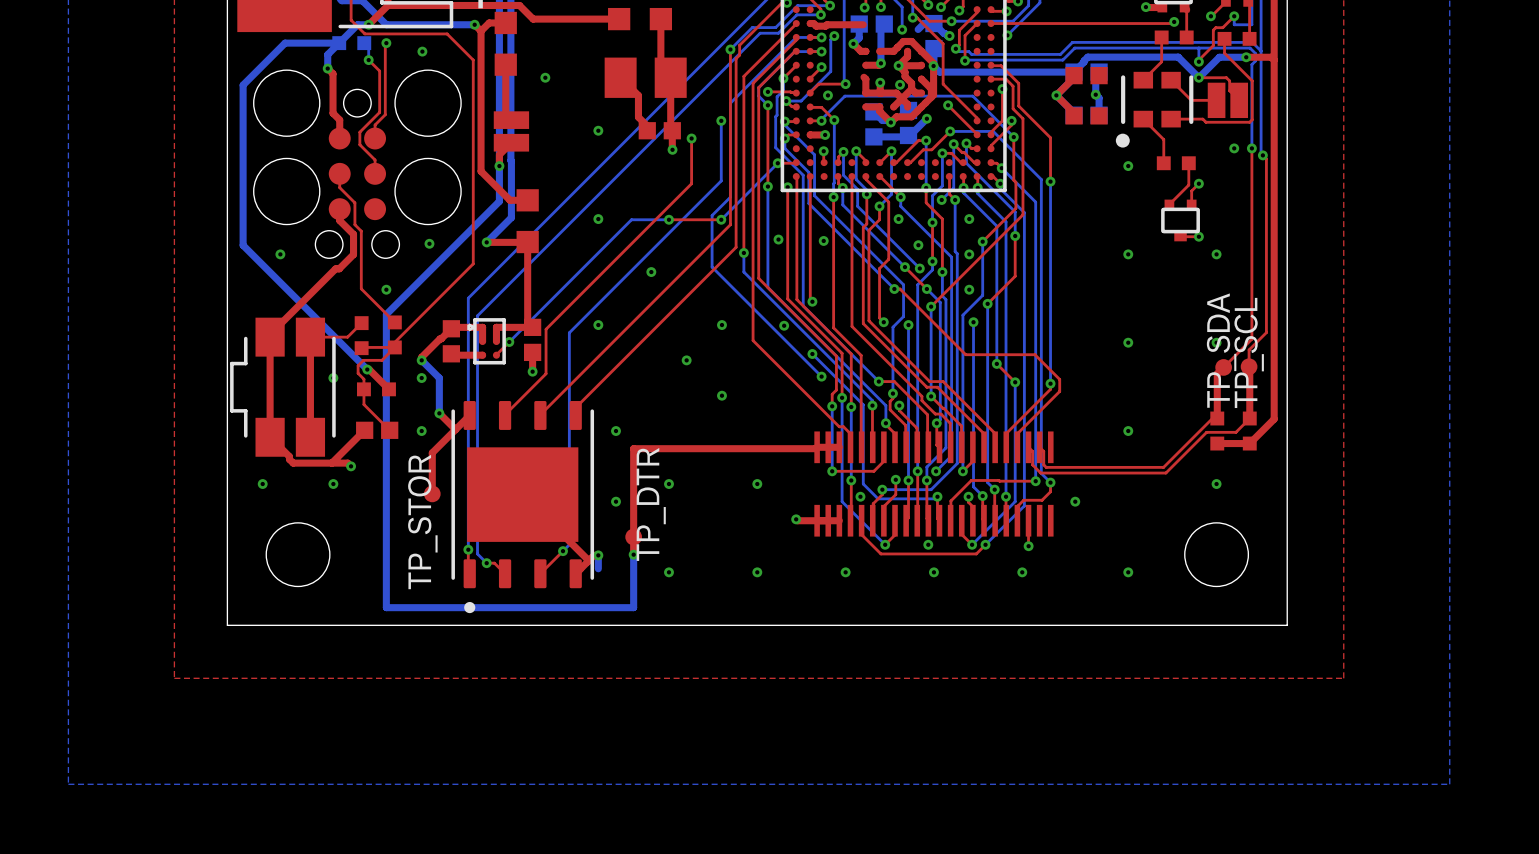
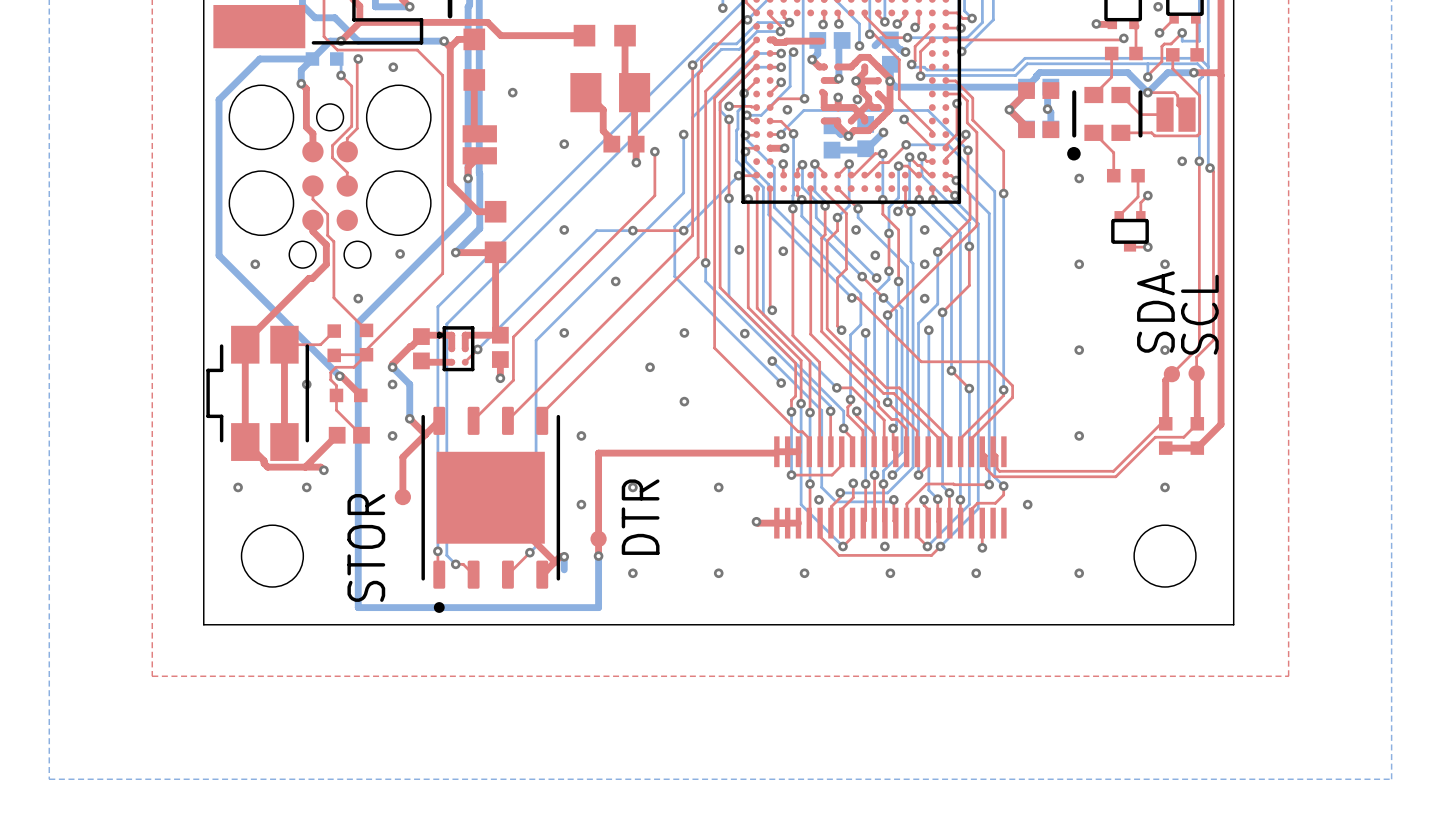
TP_SDA name: TP_SDA (1221, 350) -> SDA (1155, 312)
TP_SCL name: TP_SCL (1249, 352) -> SCL (1199, 314)
TP_DTR name: TP_DTR (651, 504) -> DTR (640, 517)
TP_STOR name: TP_STOR (422, 522) -> STOR (366, 547)

